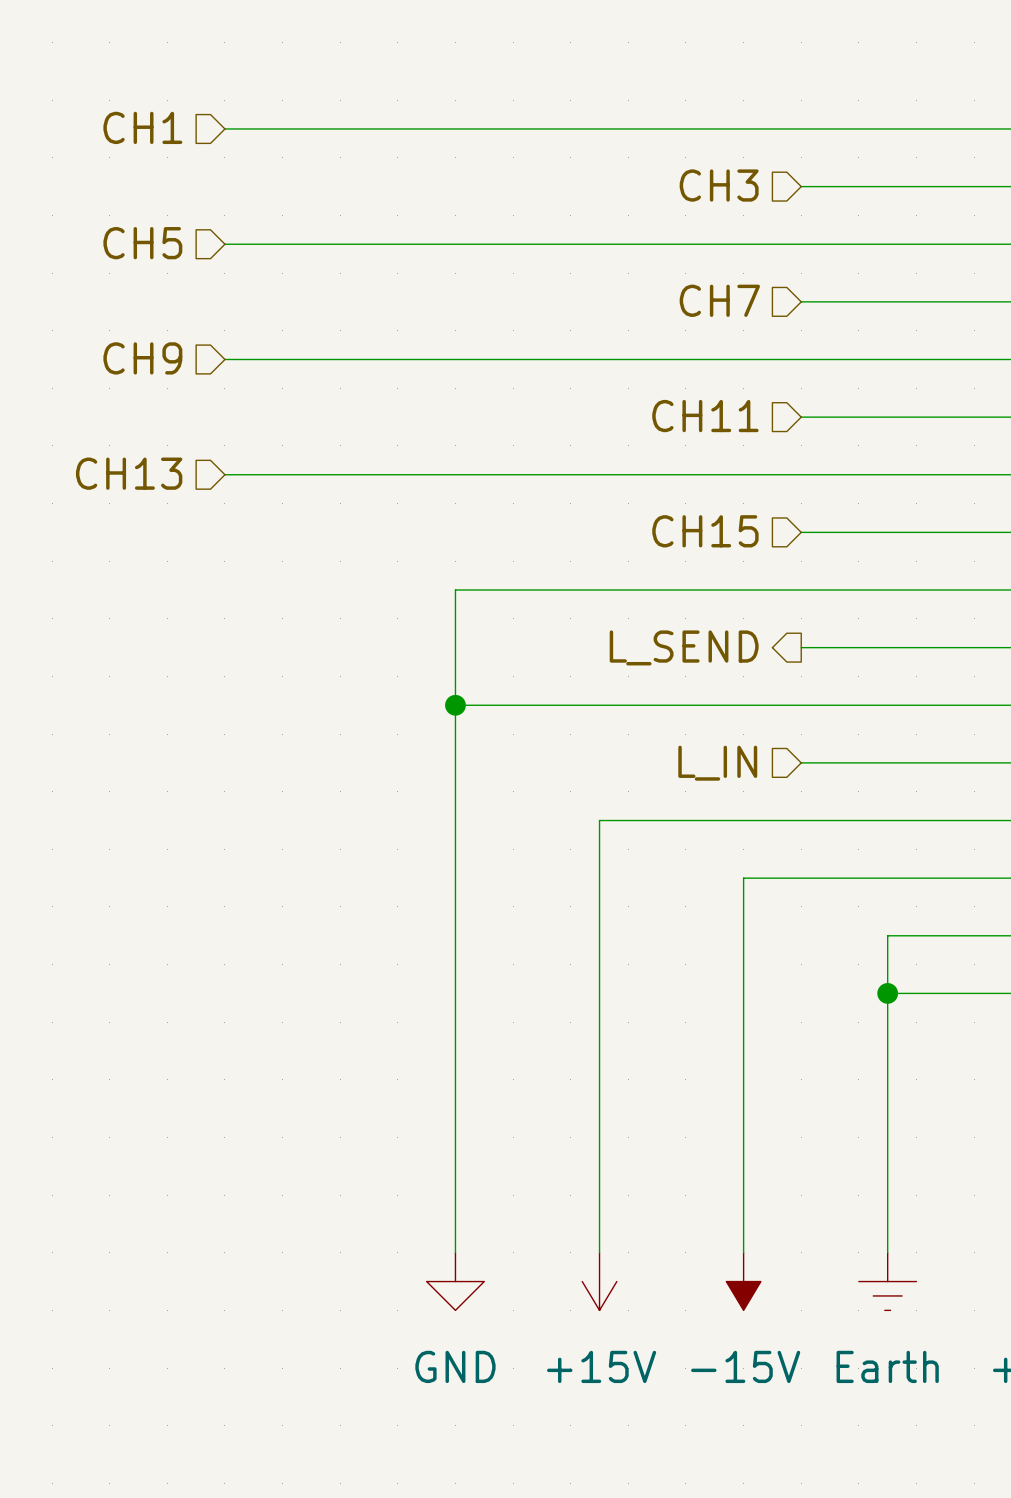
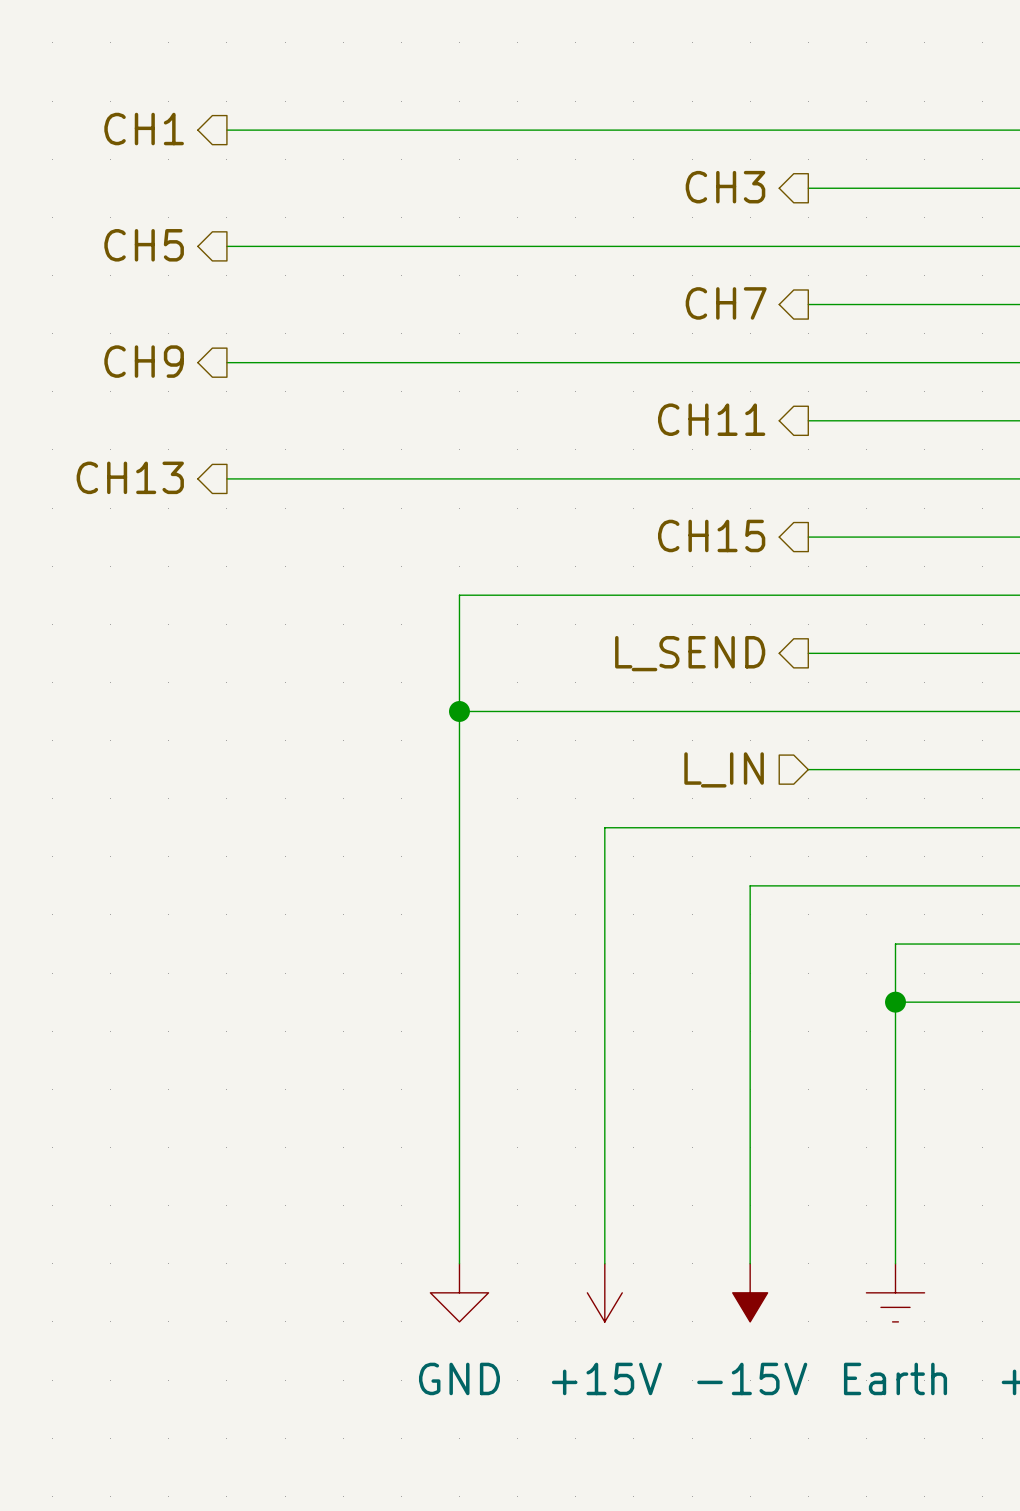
hierarchical label shape: input (142, 127) -> output (144, 129)
hierarchical label shape: input (719, 185) -> output (725, 187)
hierarchical label shape: input (142, 243) -> output (144, 245)
hierarchical label shape: input (719, 300) -> output (726, 303)
hierarchical label shape: input (142, 358) -> output (144, 361)
hierarchical label shape: input (705, 416) -> output (711, 419)
hierarchical label shape: input (129, 473) -> output (130, 477)
hierarchical label shape: input (705, 531) -> output (711, 535)

